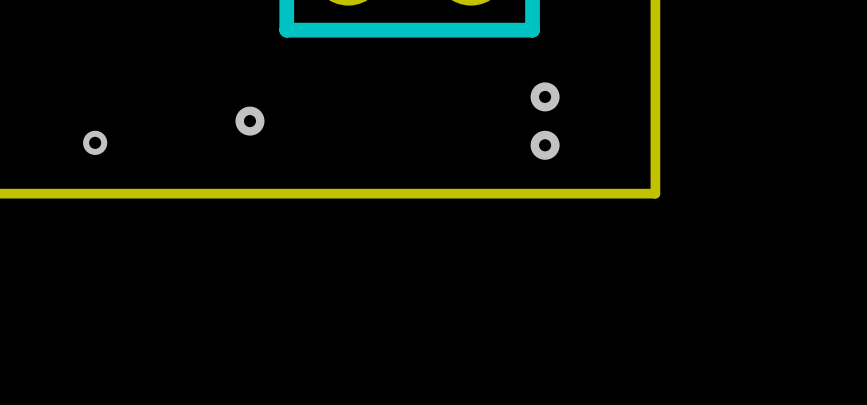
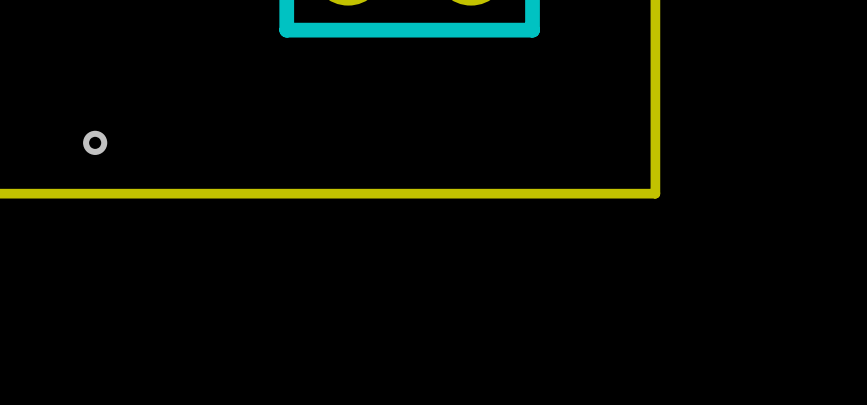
via: (545, 96) -> none
via: (249, 121) -> none
via: (545, 145) -> none

